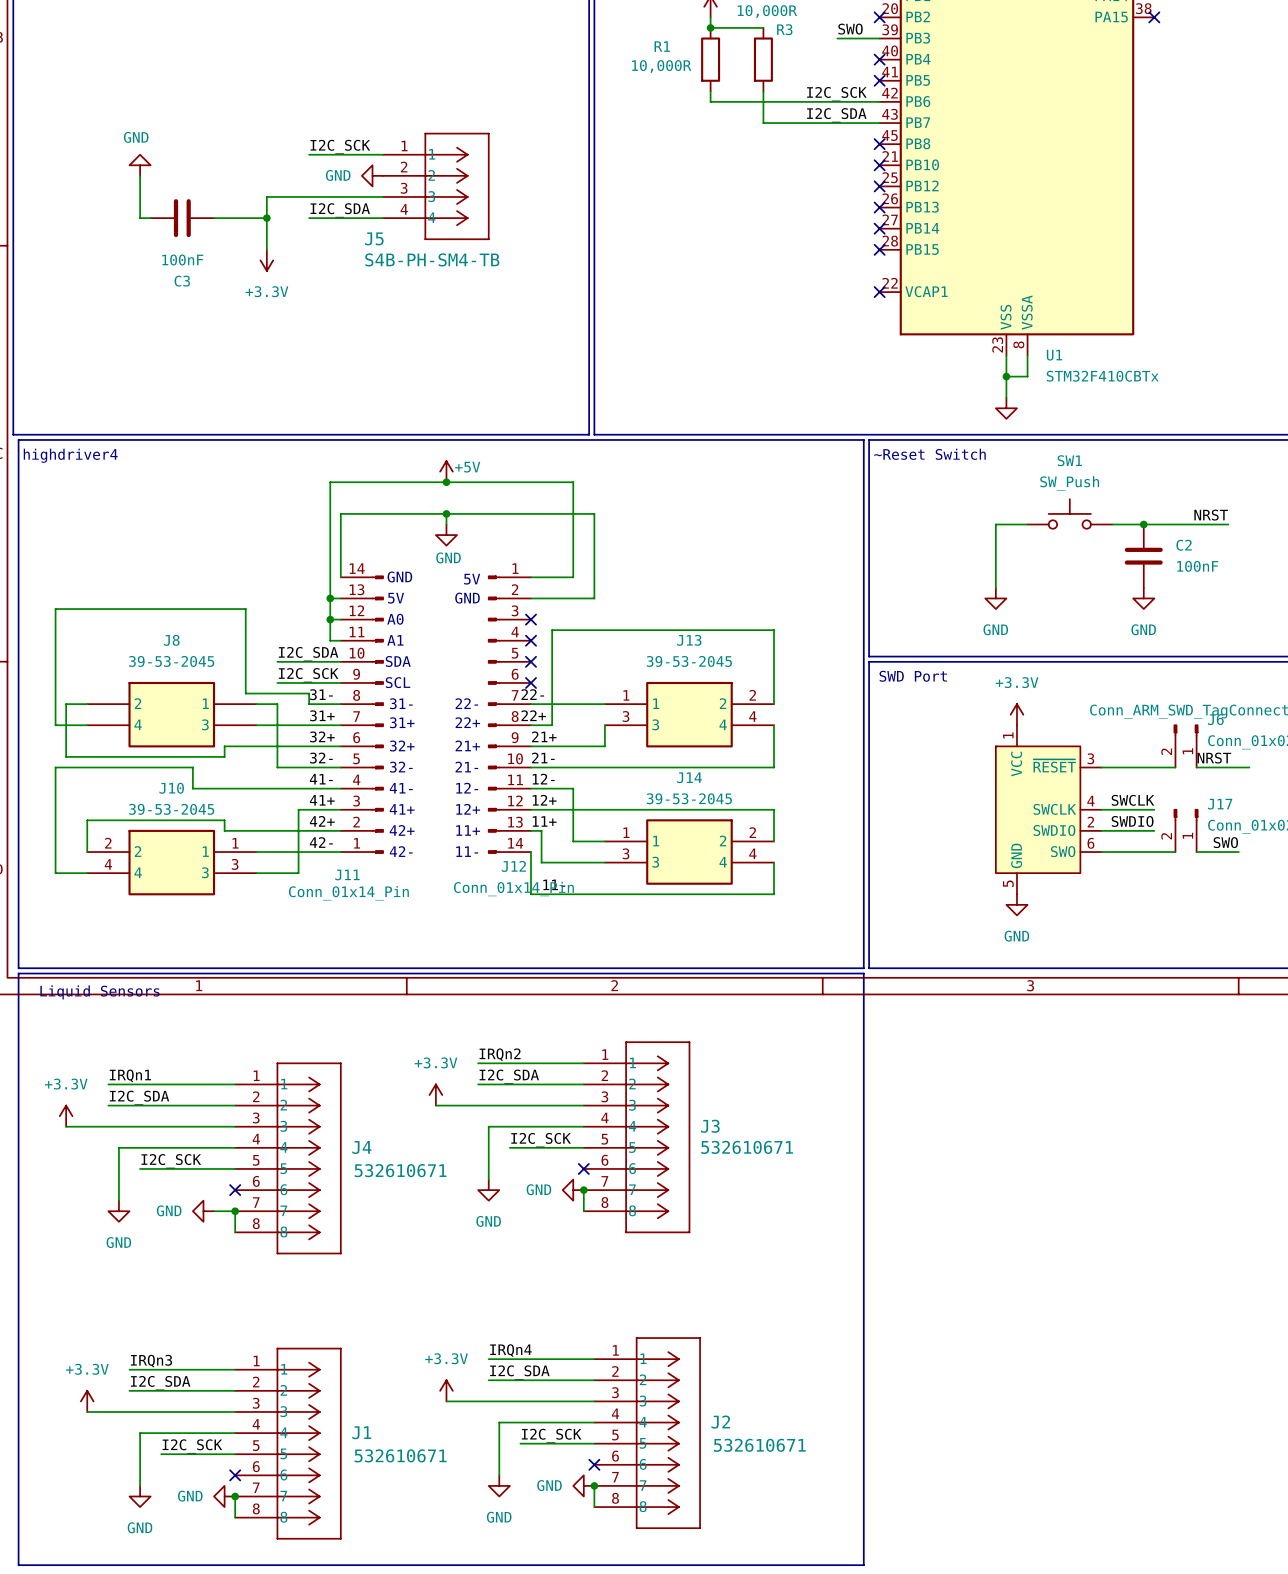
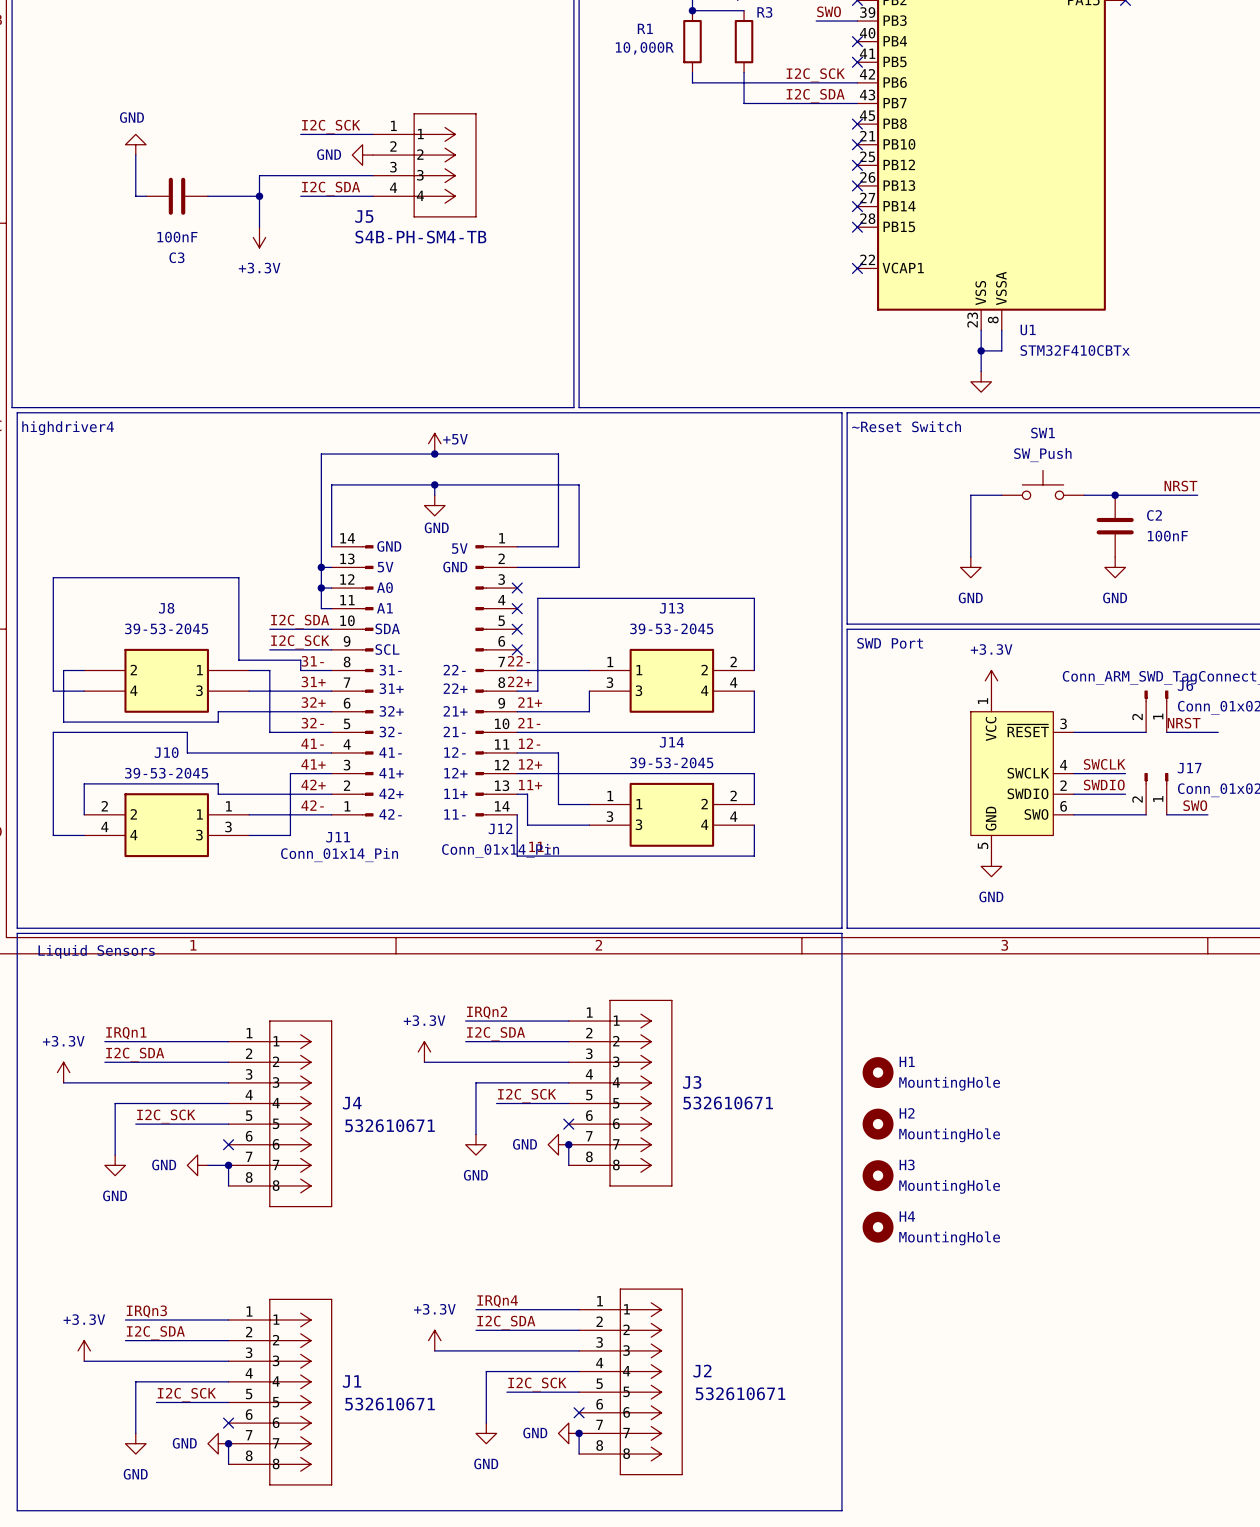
H1: none -> MountingHole (878, 1072)
H2: none -> MountingHole (878, 1124)
H3: none -> MountingHole (878, 1175)
H4: none -> MountingHole (878, 1227)

